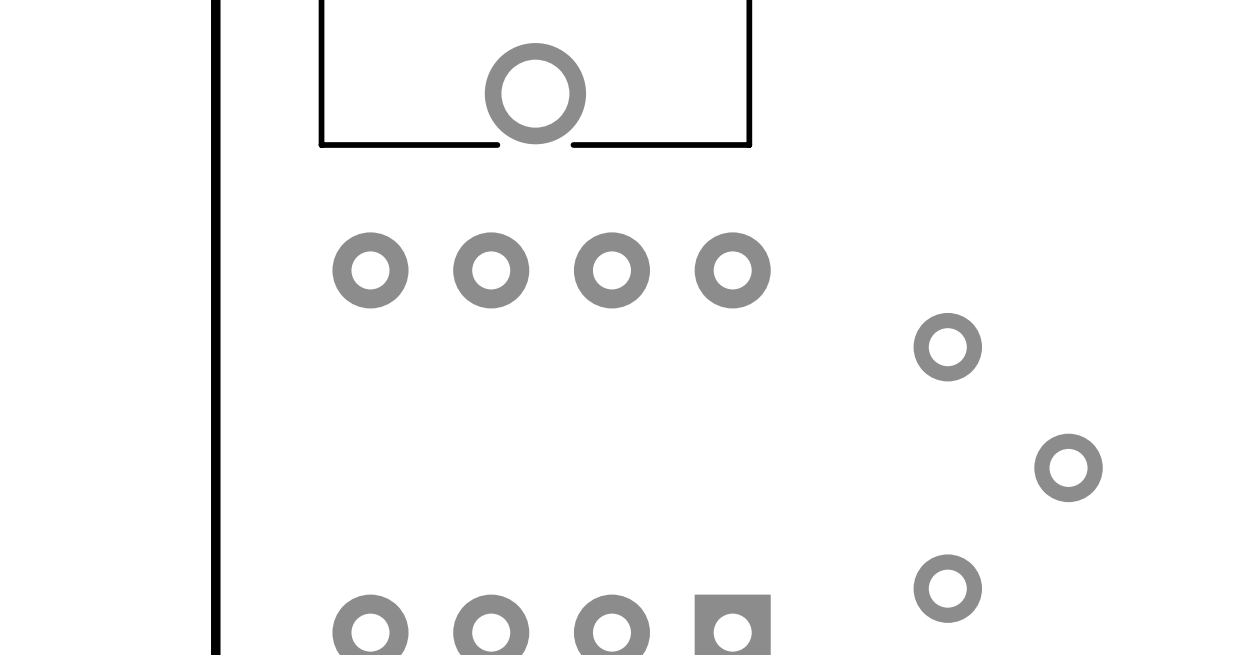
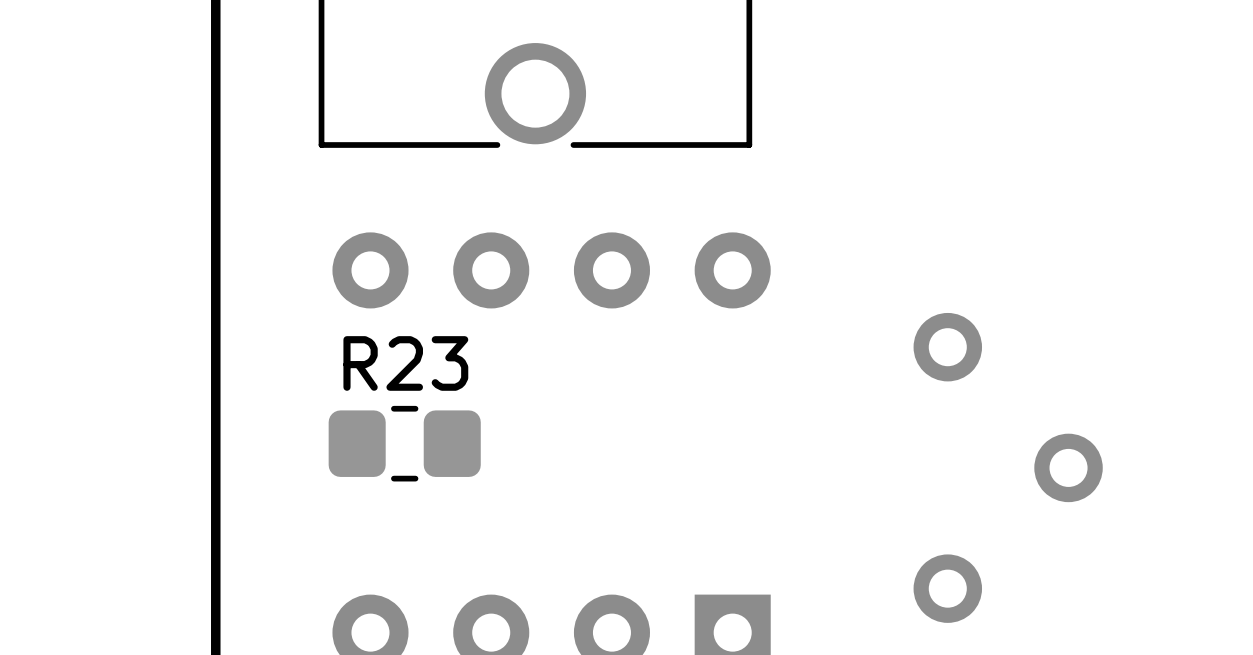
R23: none -> (404, 443)

